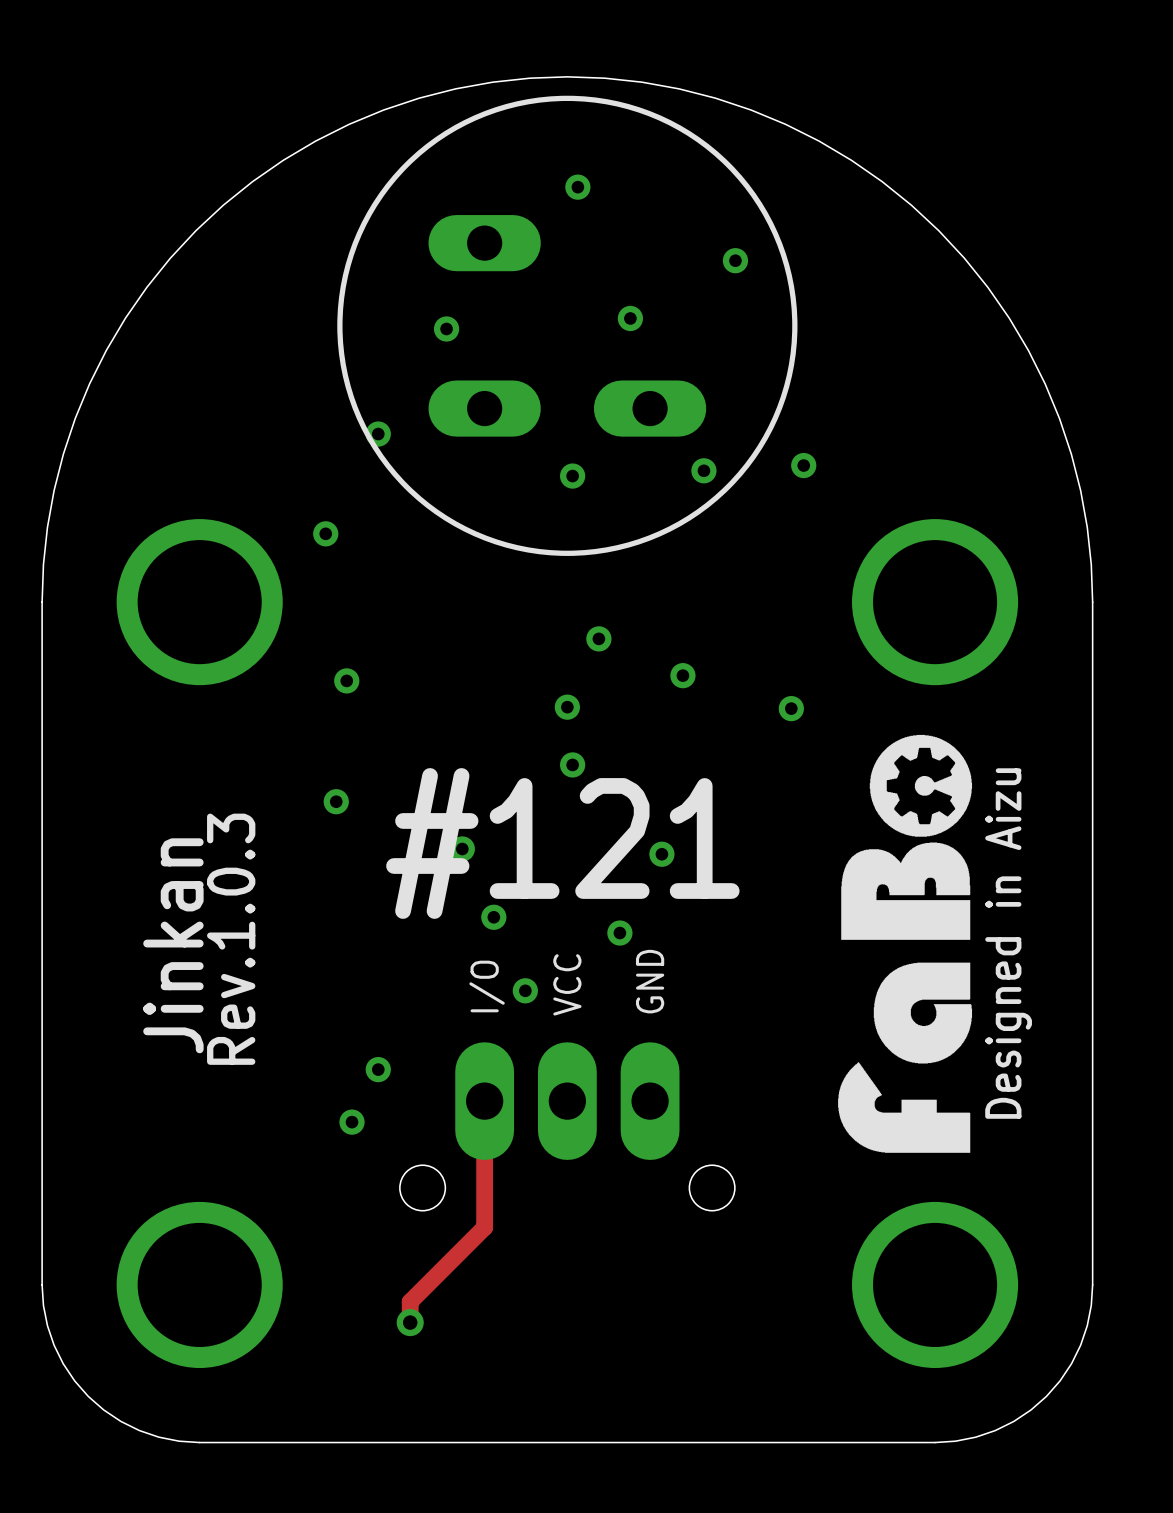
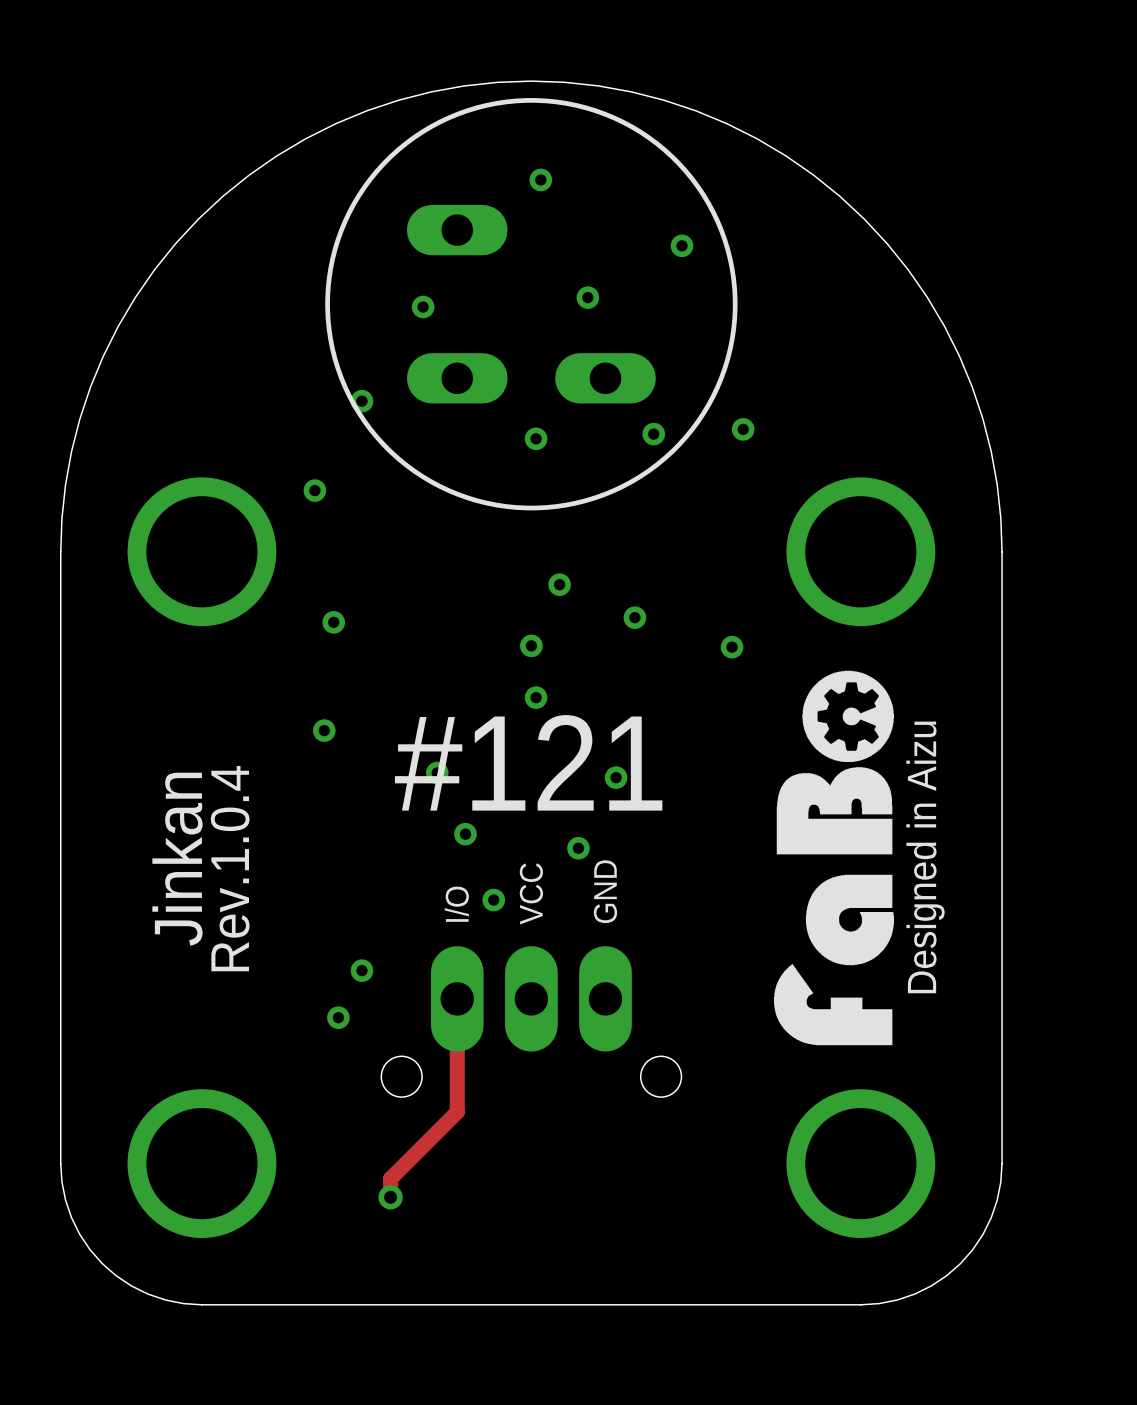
text: Rev.1.0.3 (231, 939) -> Rev.1.0.4 (230, 868)

